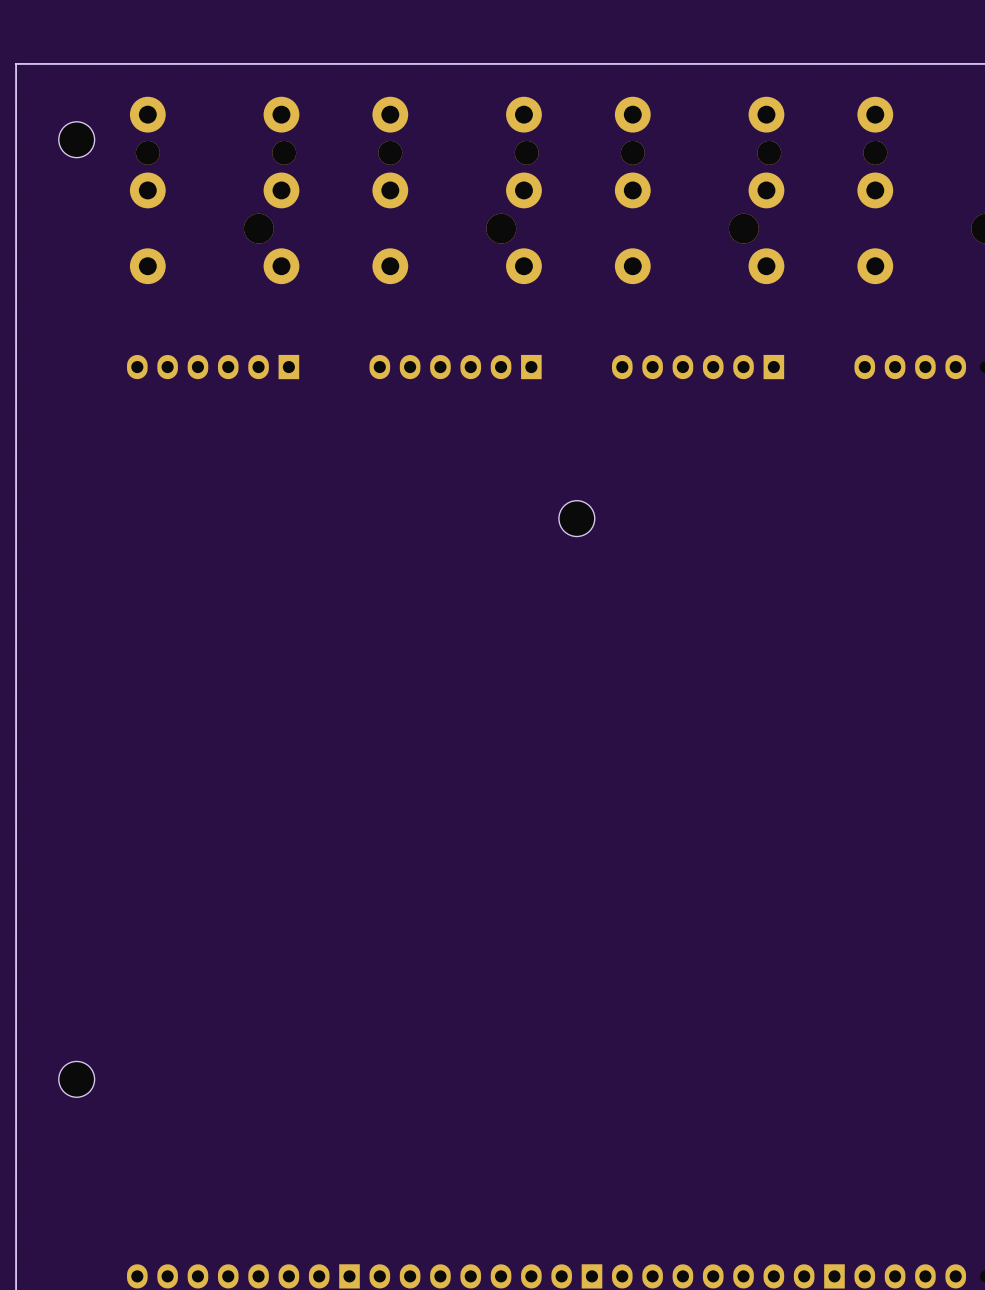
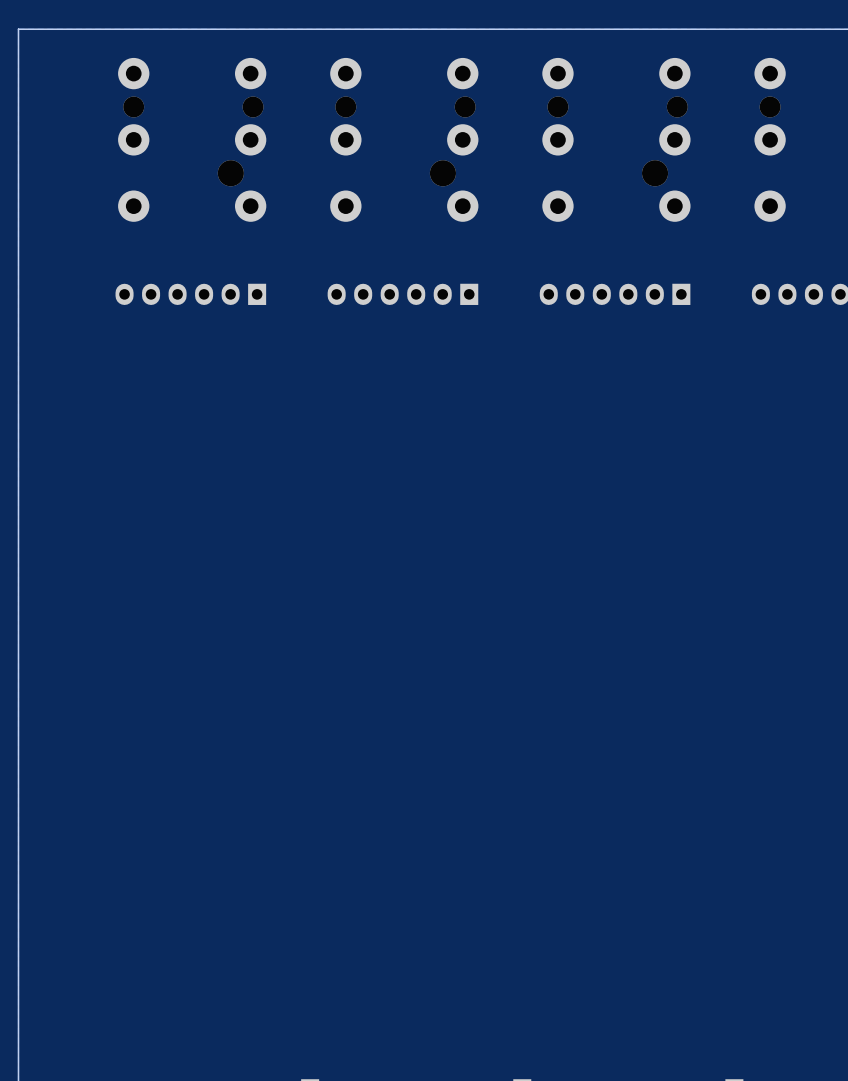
part: (76, 139) -> none
part: (576, 518) -> none
part: (76, 1079) -> none

